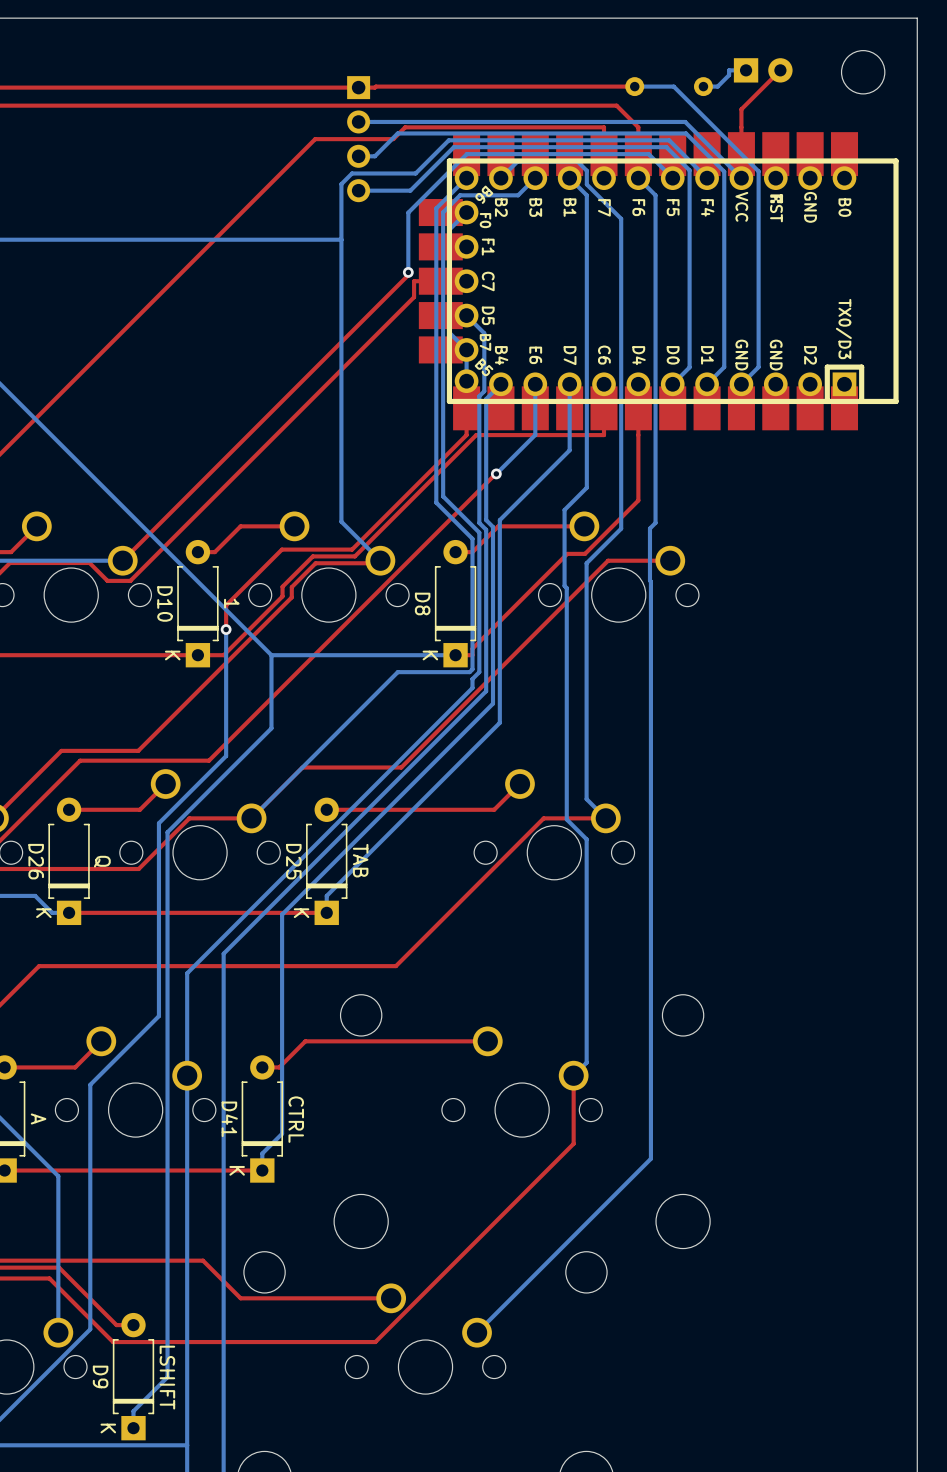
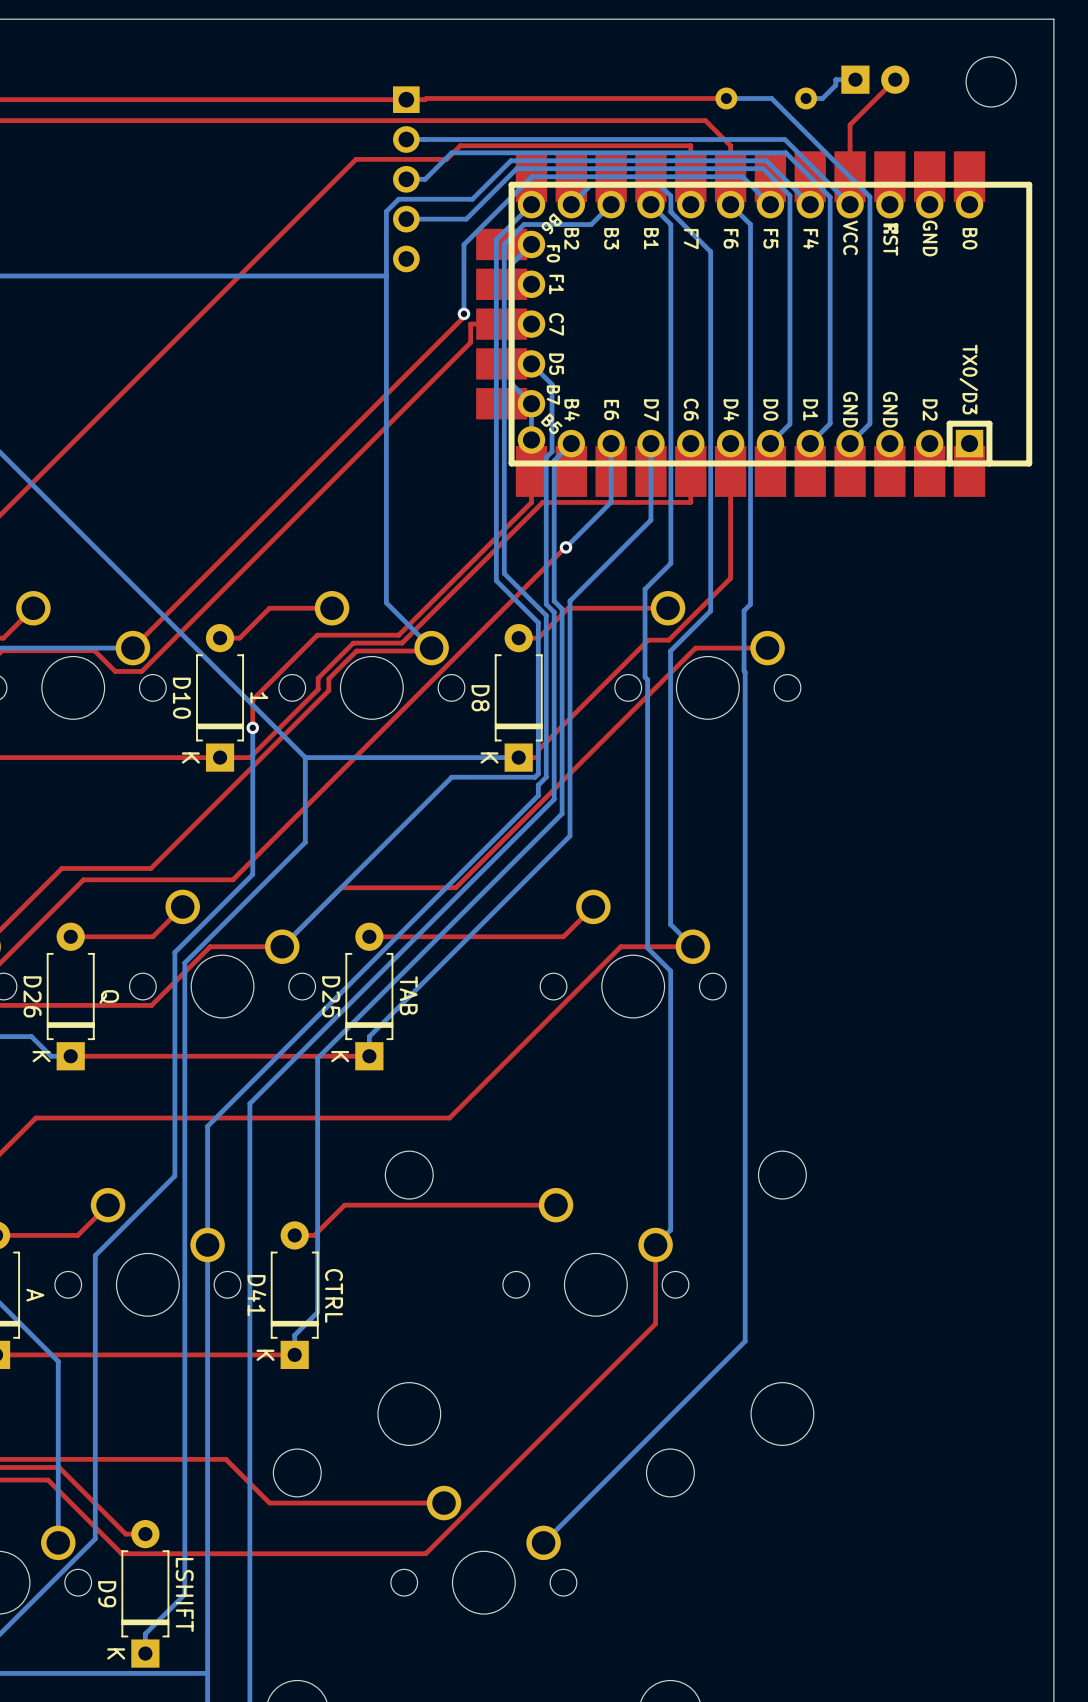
part: none -> (406, 179)

